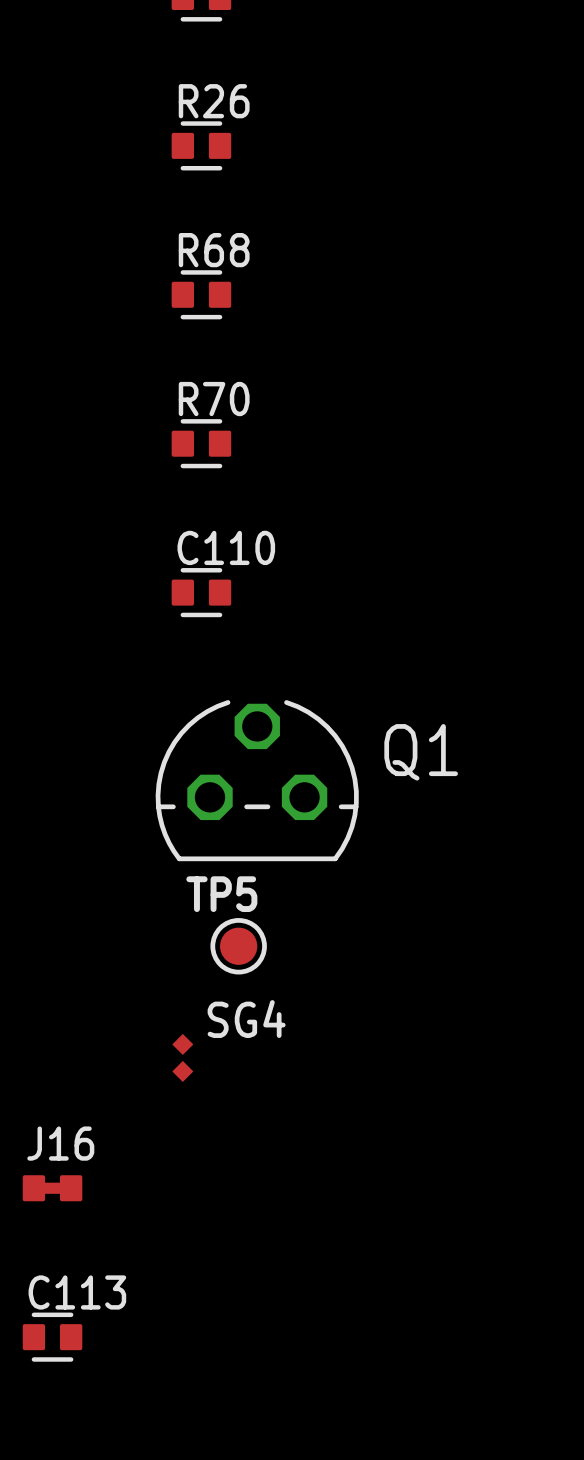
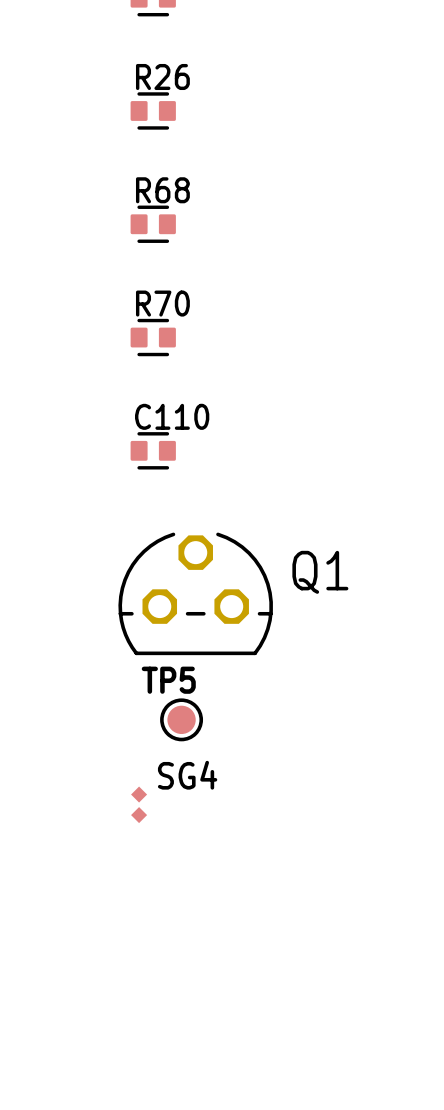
J16: (52, 1188) -> none
C113: (52, 1337) -> none

